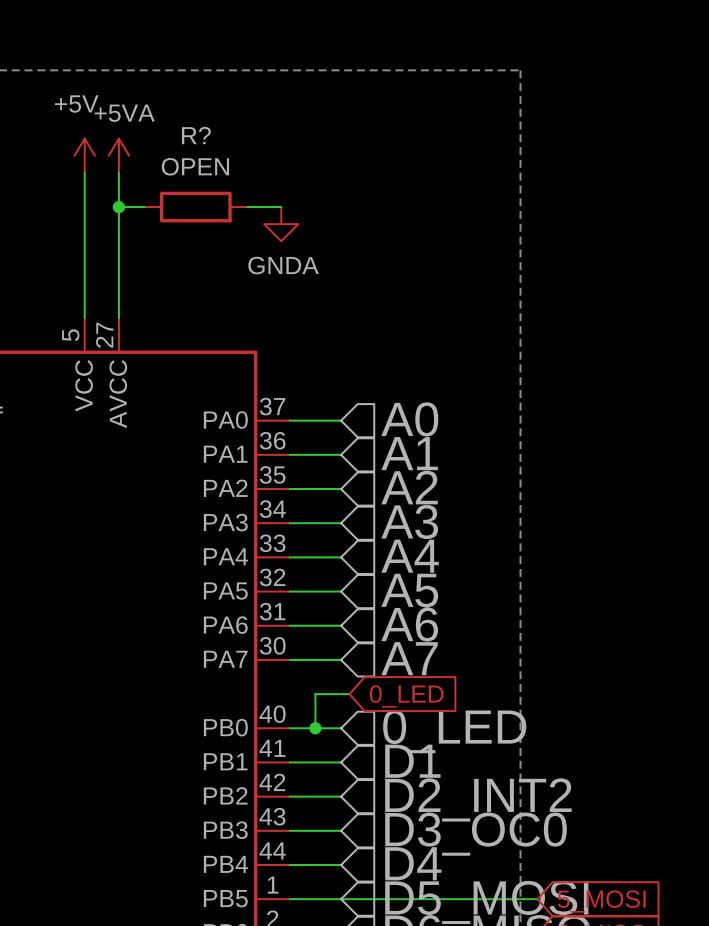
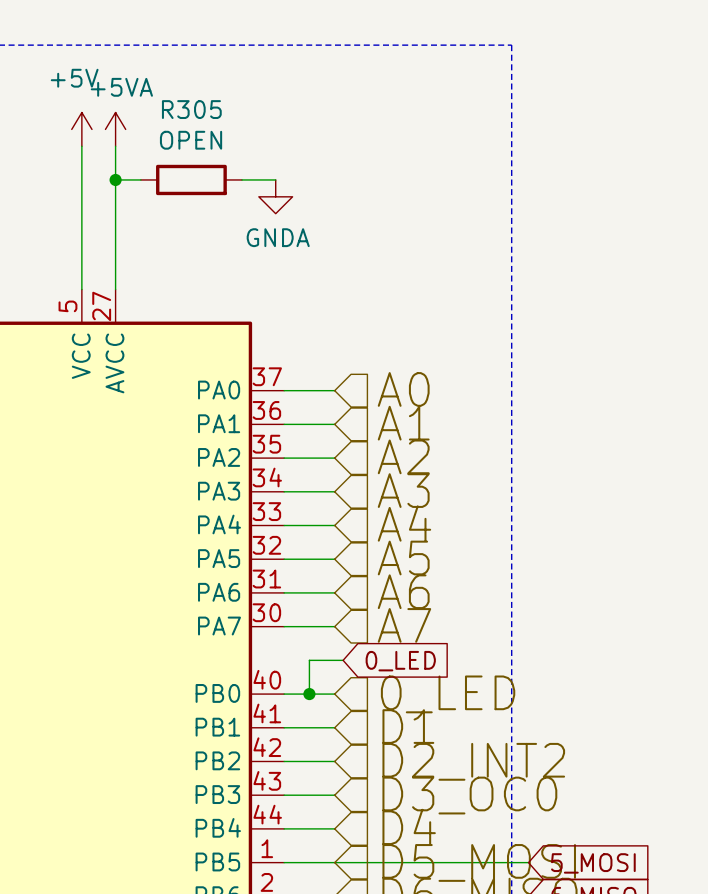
R? name: R? (196, 135) -> R305 (191, 109)

